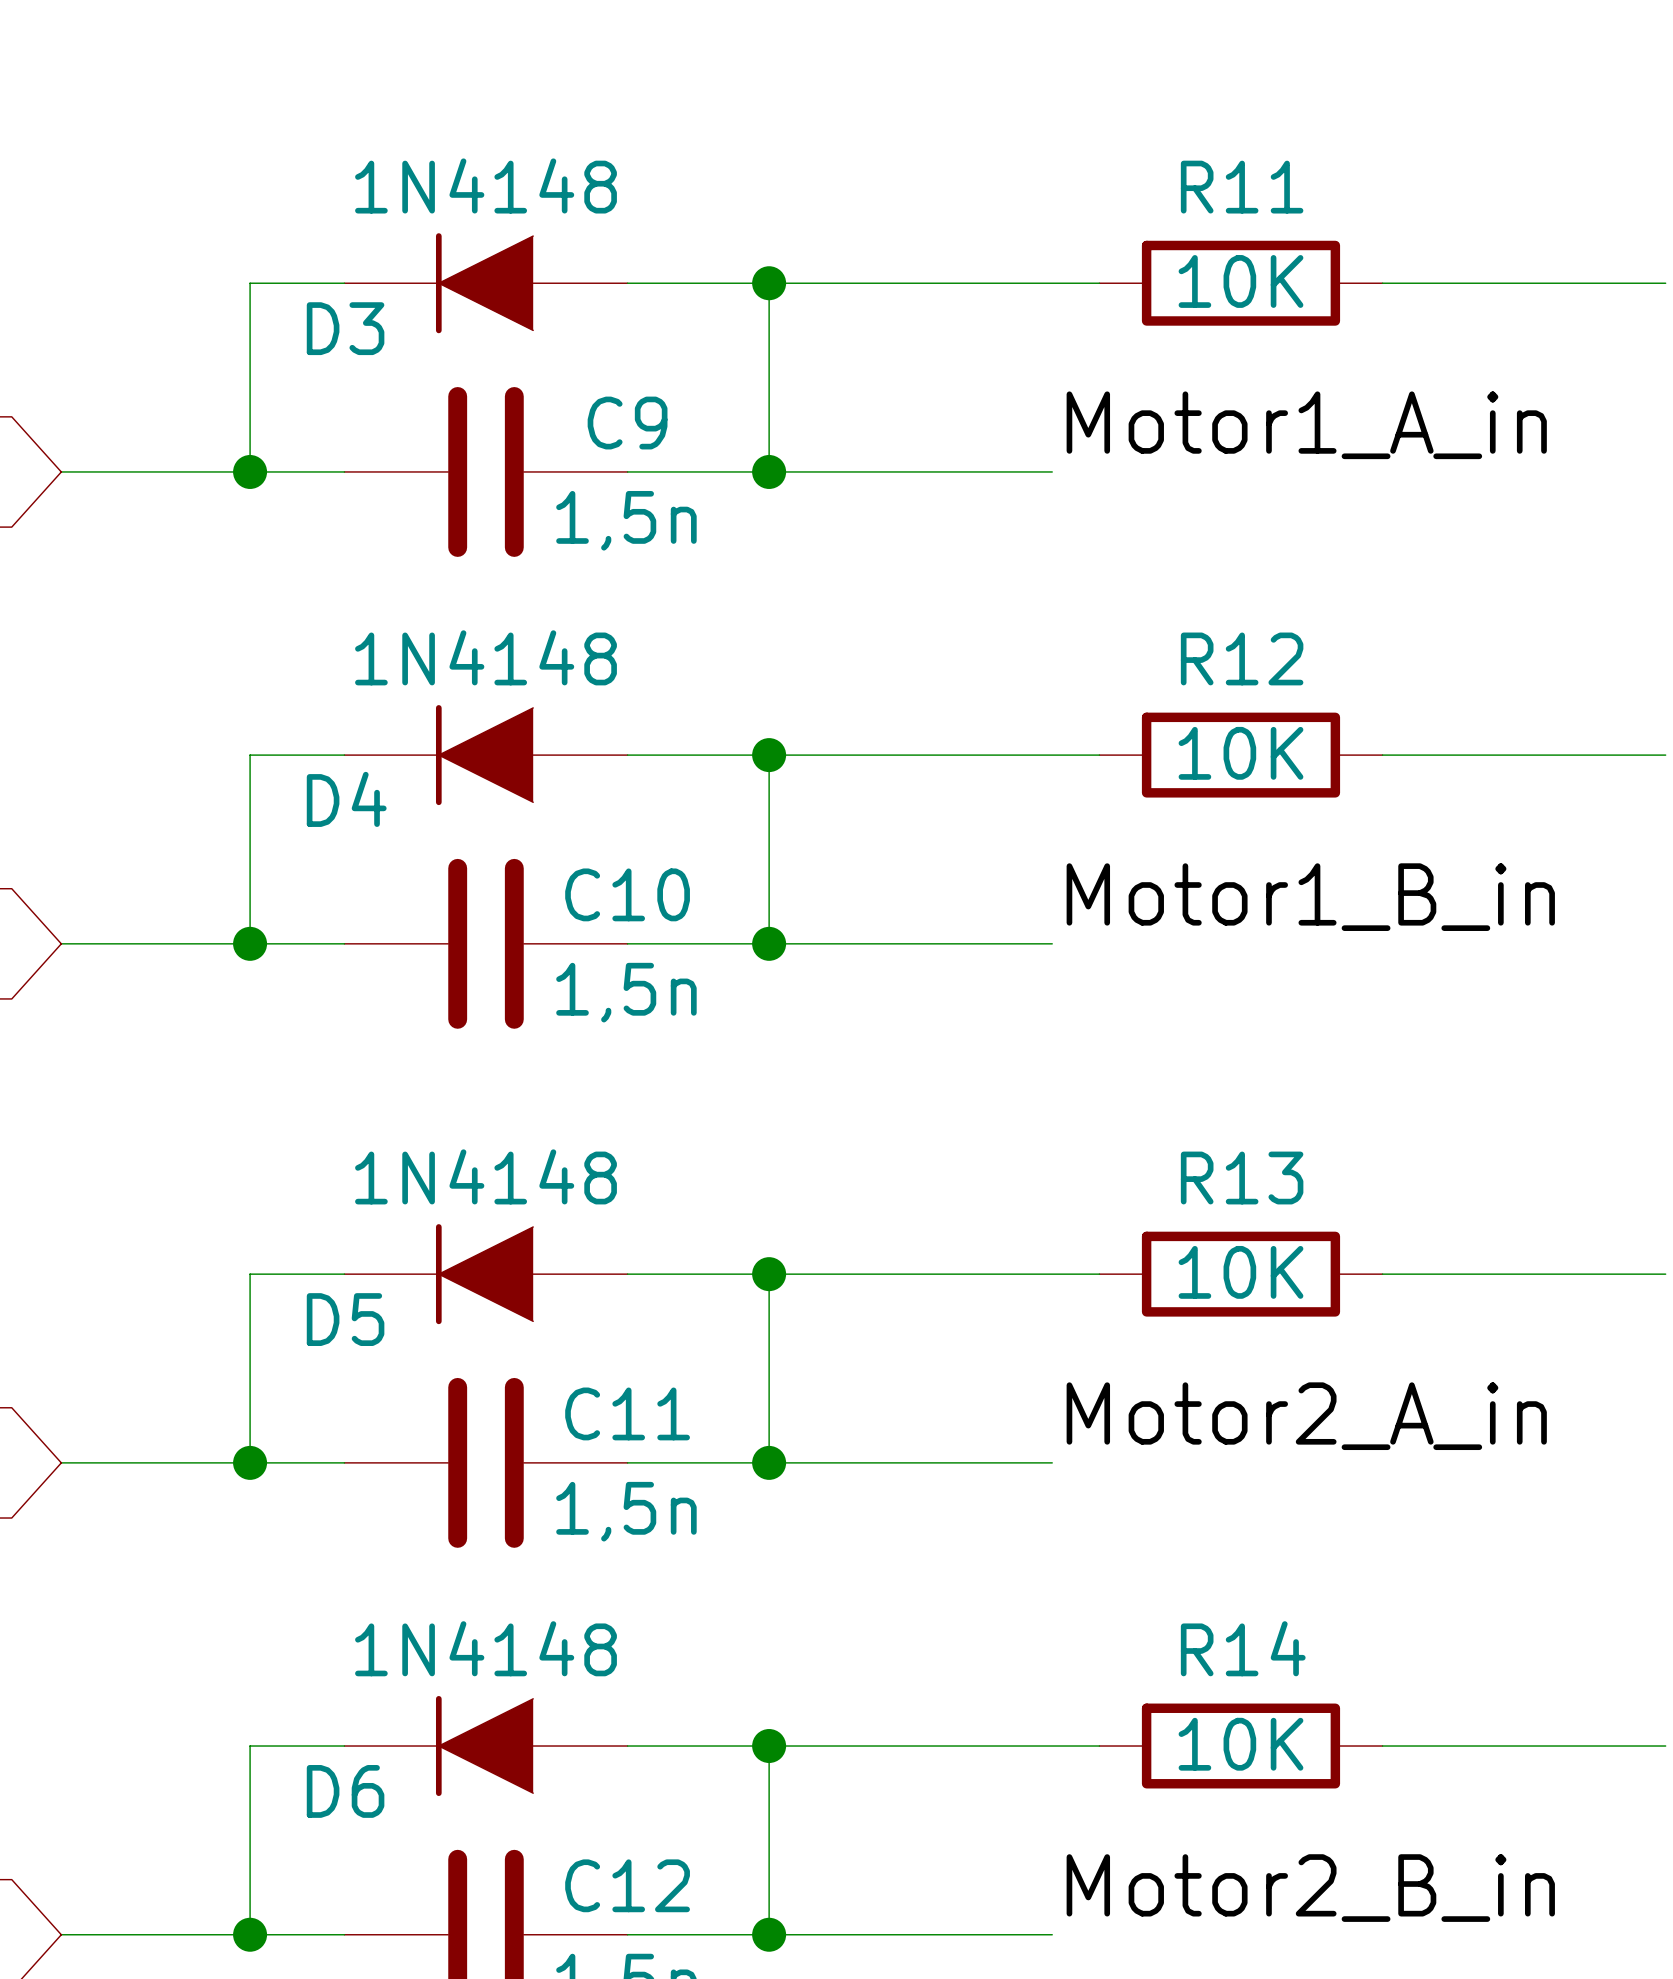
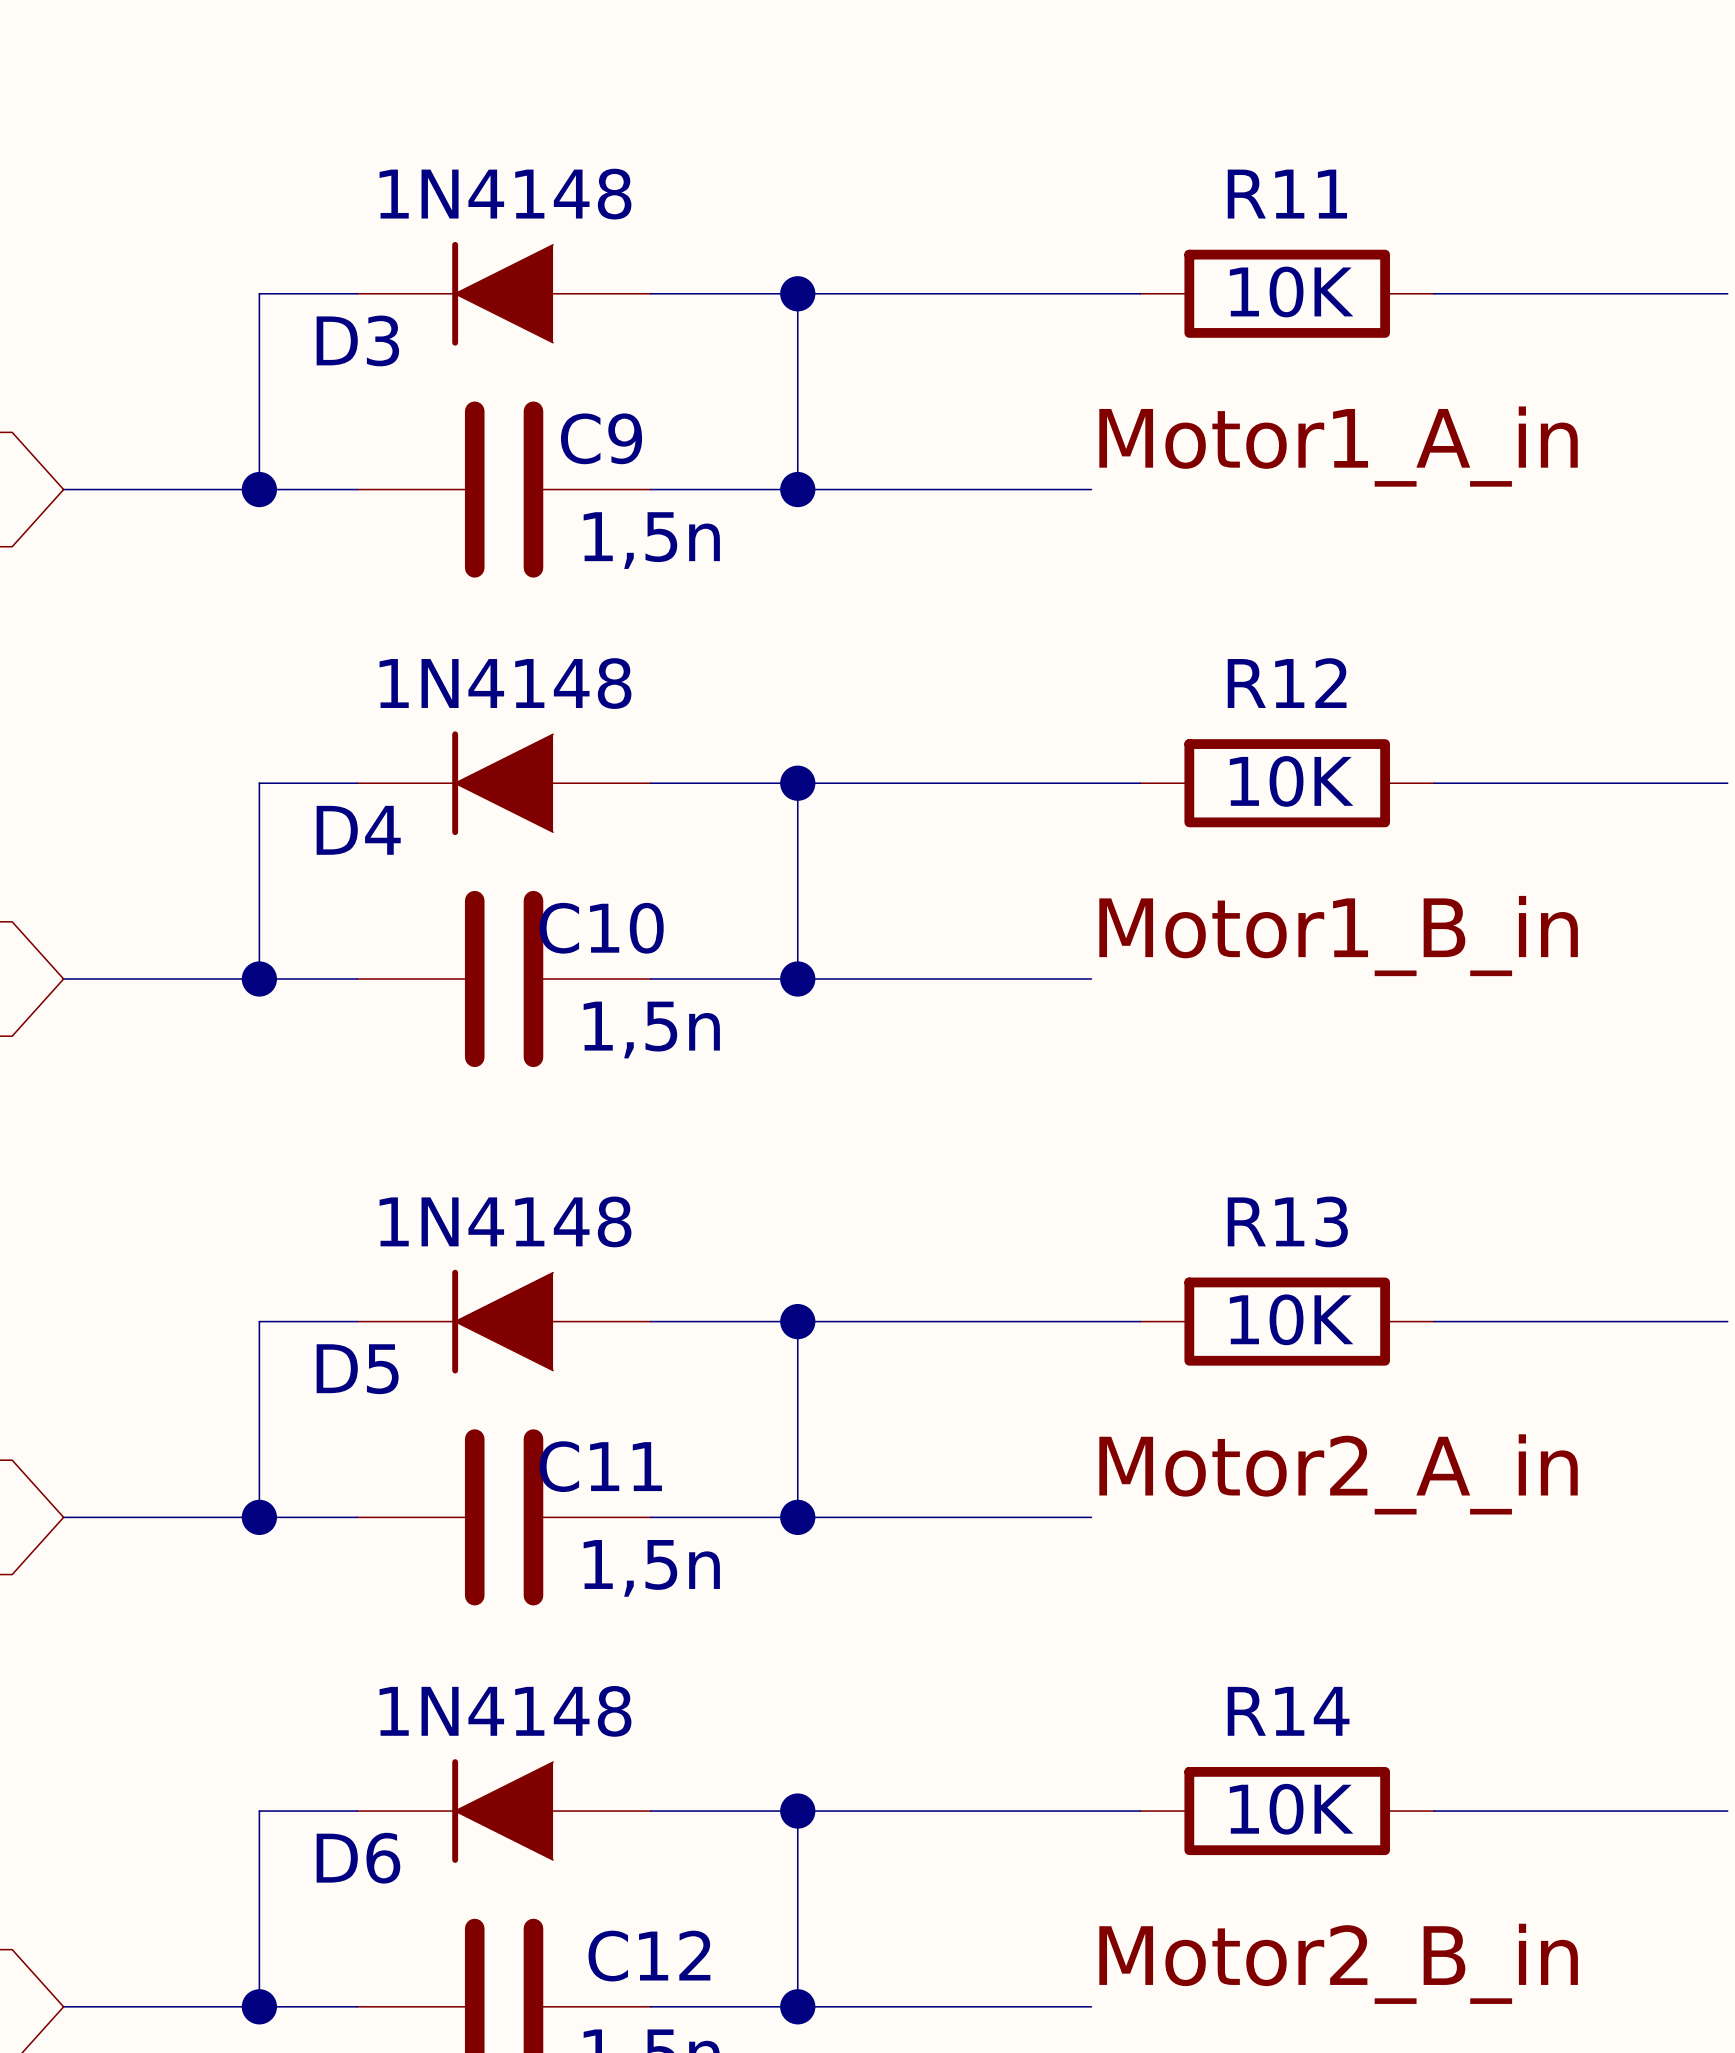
C9 name position: C9 (627, 423) -> C9 (601, 438)
C10 name position: C10 (627, 894) -> C10 (601, 928)
C11 name position: C11 (627, 1413) -> C11 (600, 1466)

